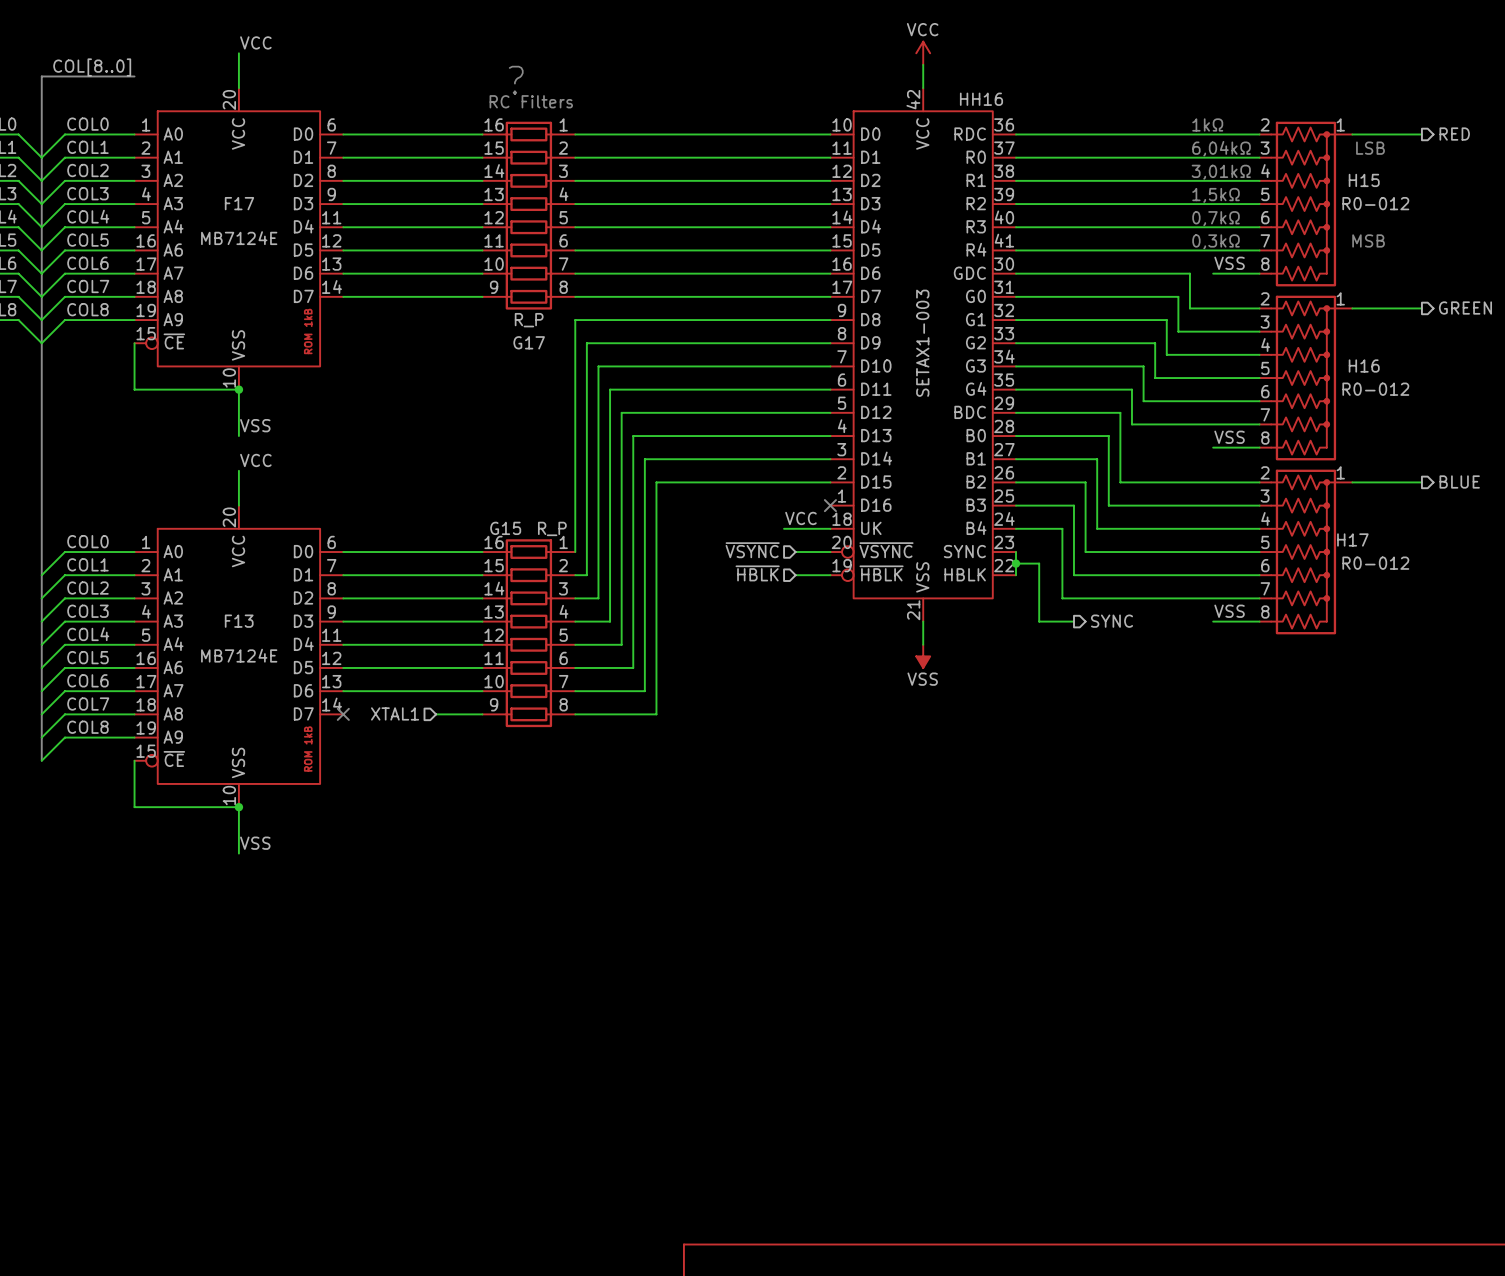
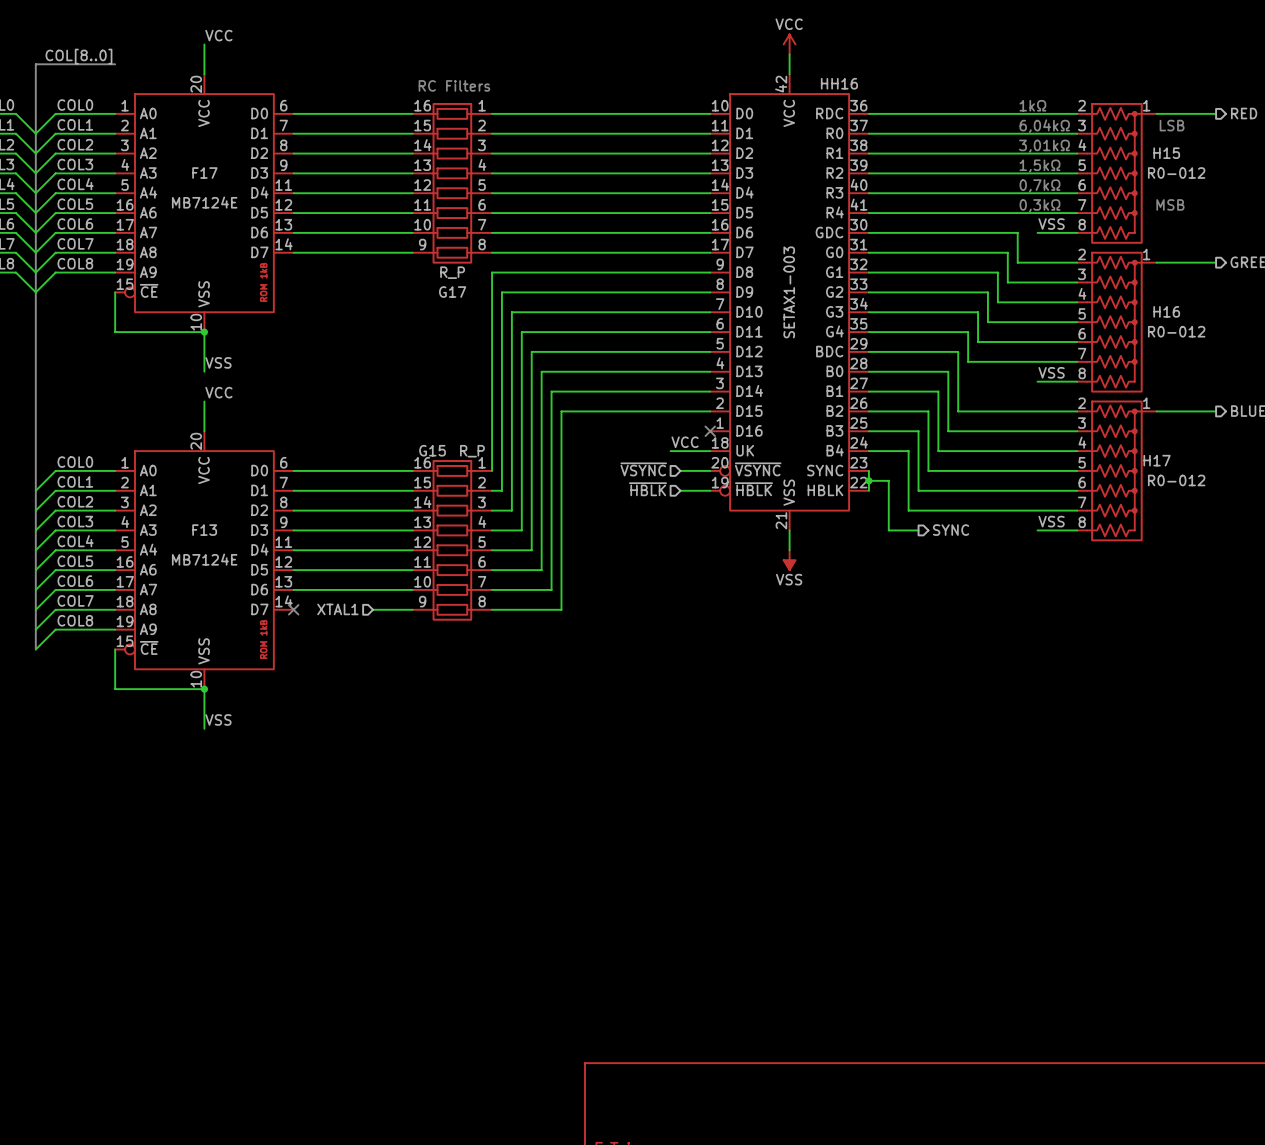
text: ? (516, 80) -> none

